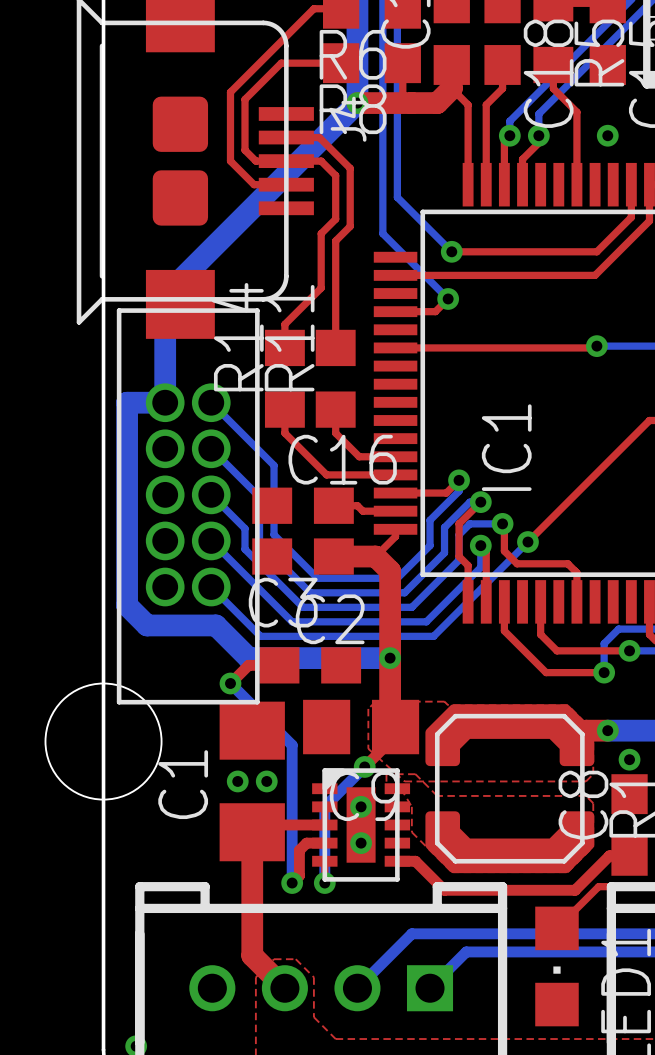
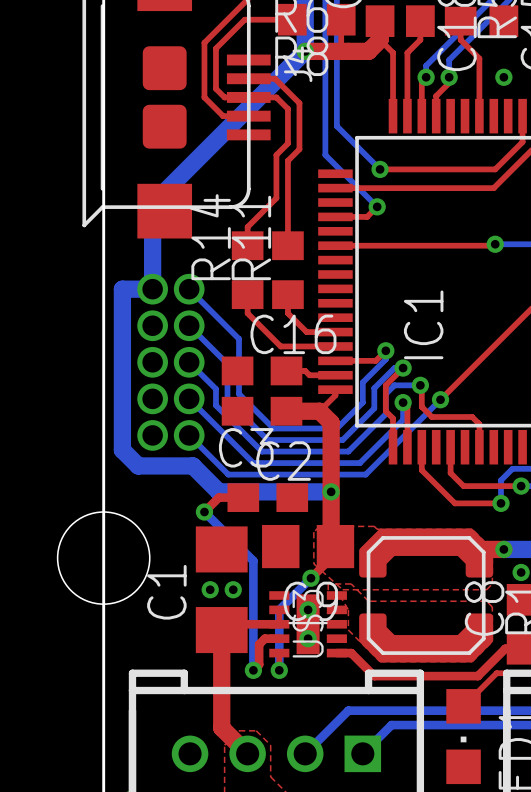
part footprint: [116, 308, 260, 705] -> [137, 273, 205, 451]
part: (361, 824) -> none
U$3: none -> (308, 624)

